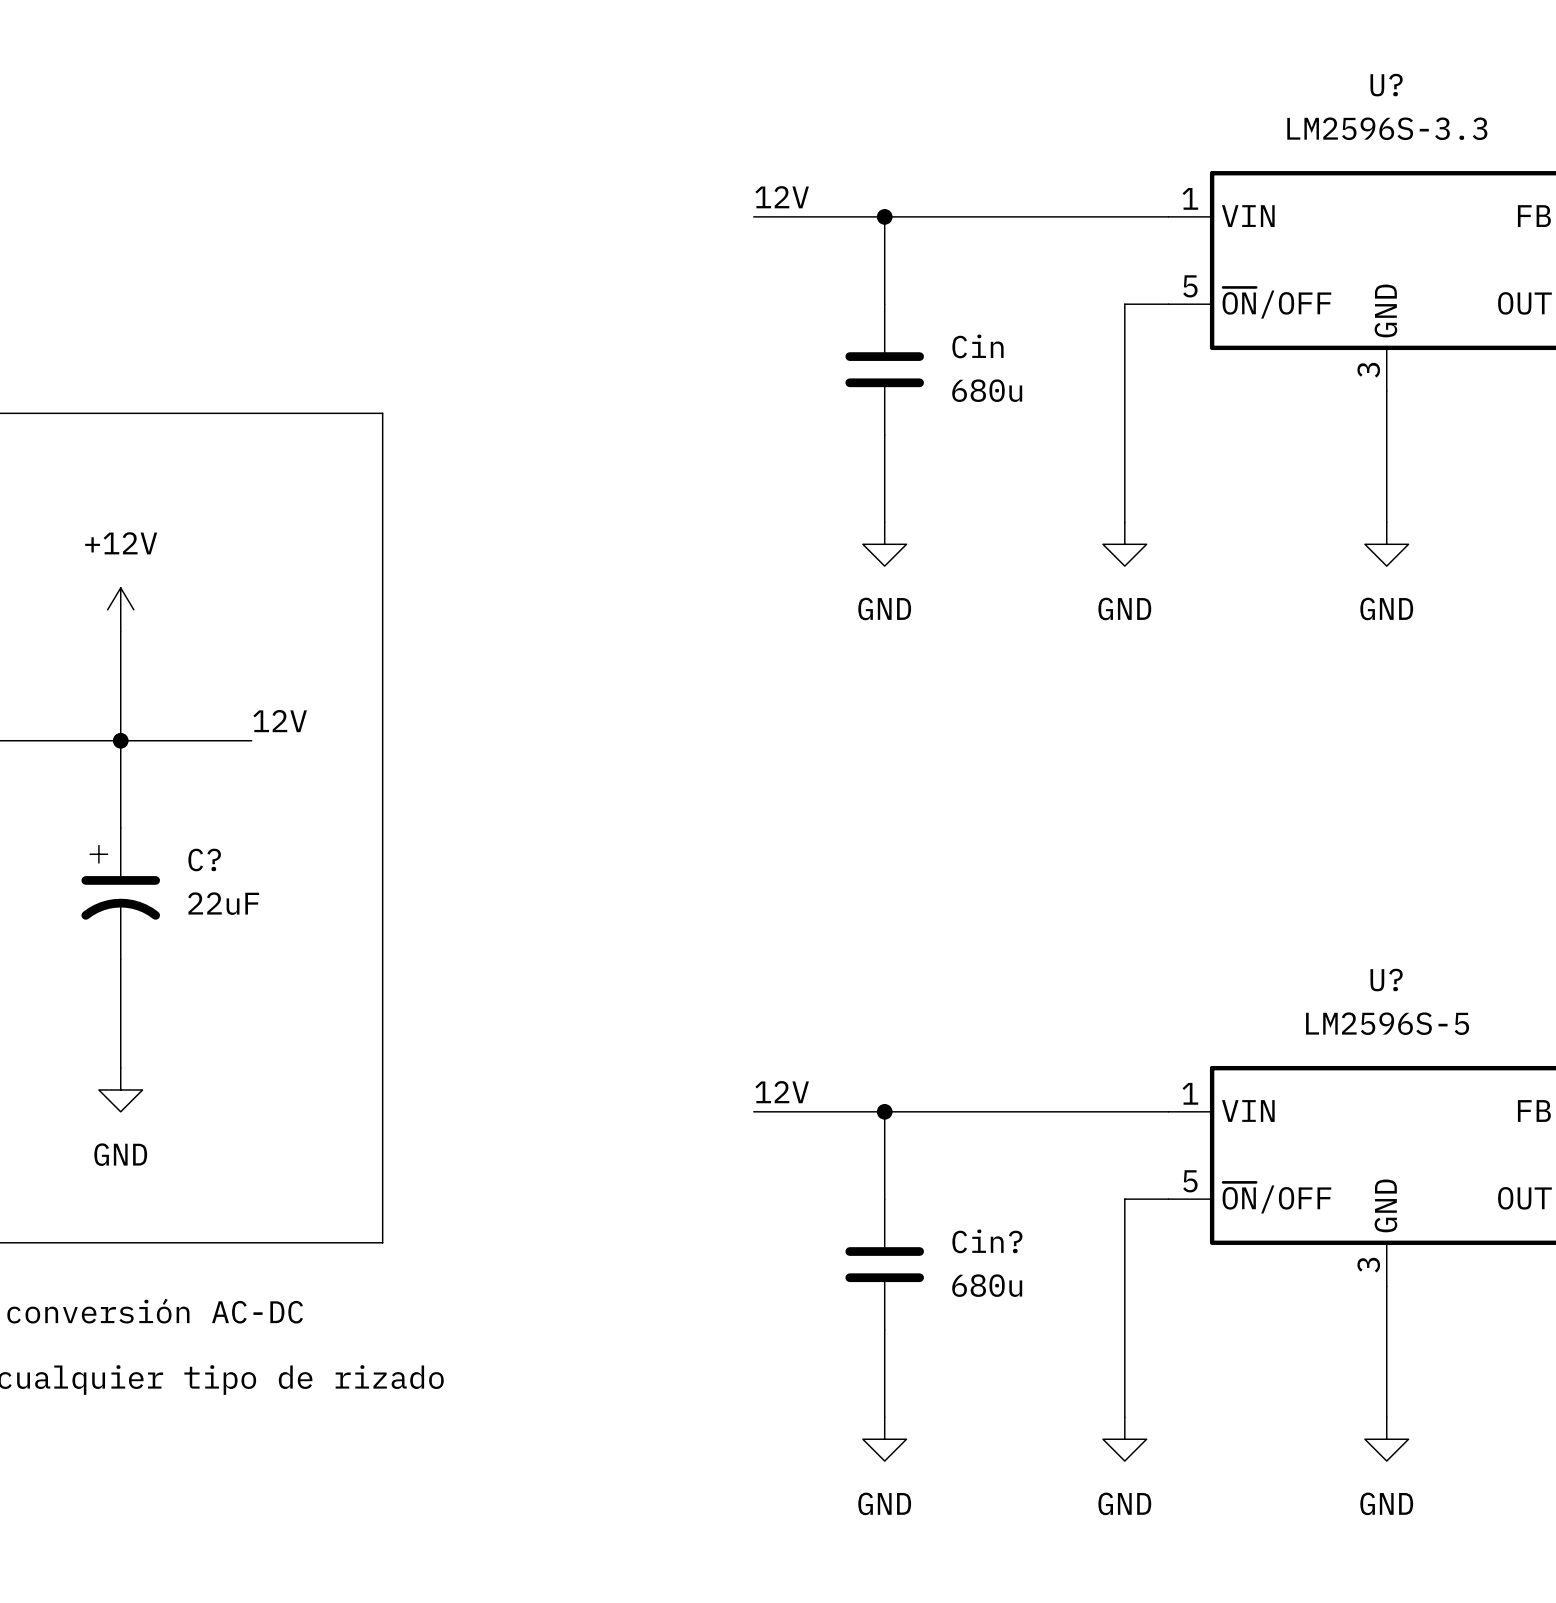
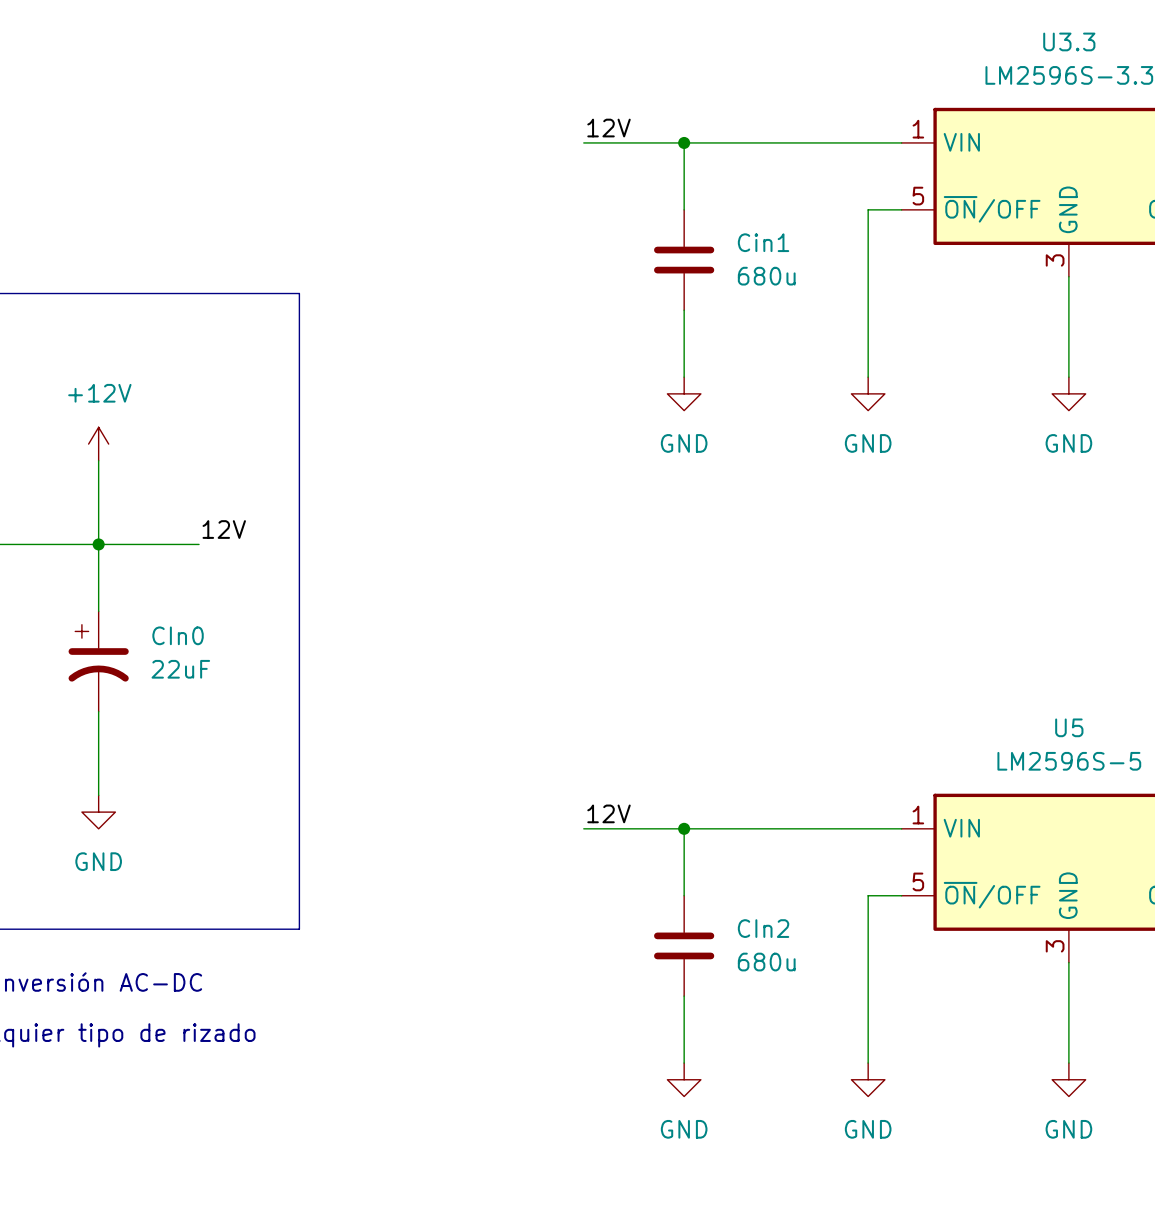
U? name: U? (1386, 85) -> U3.3 (1069, 41)
Cin name: Cin (977, 346) -> Cin1 (763, 242)
C? name: C? (204, 859) -> CIn0 (178, 635)
U? name: U? (1386, 980) -> U5 (1069, 727)
Cin? name: Cin? (987, 1241) -> CIn2 (763, 928)

